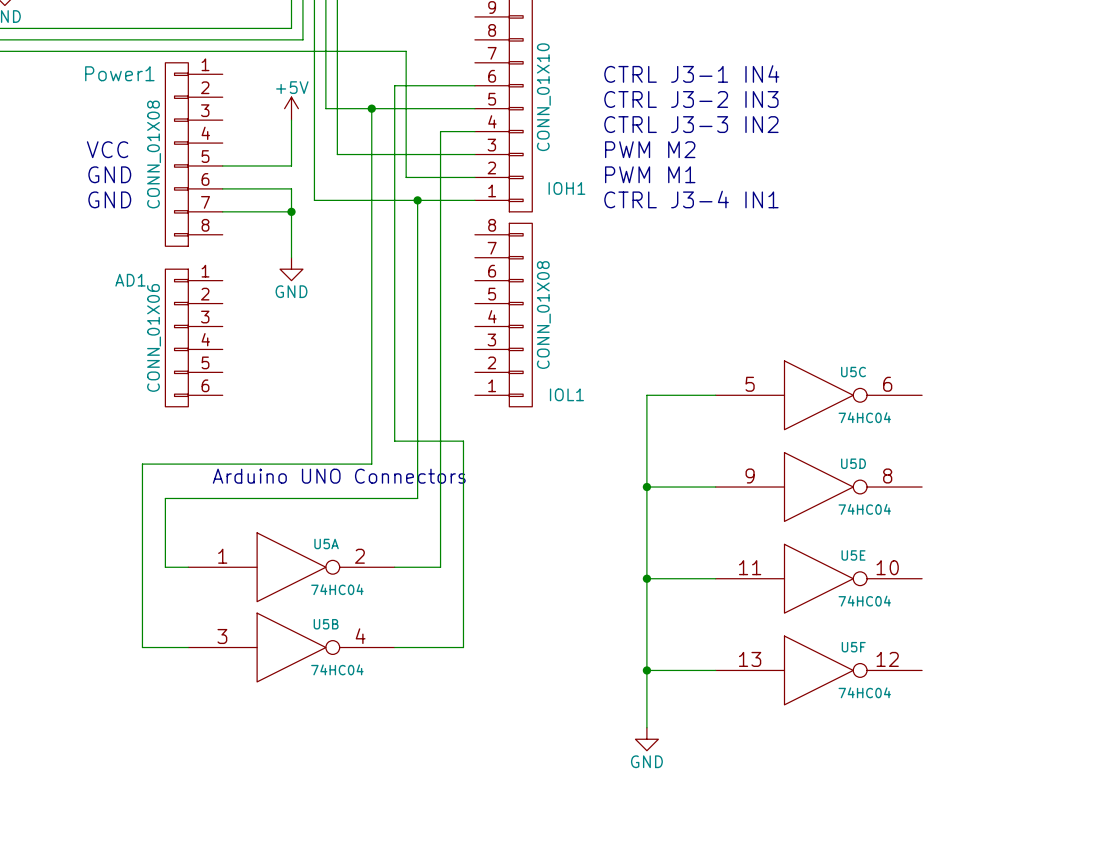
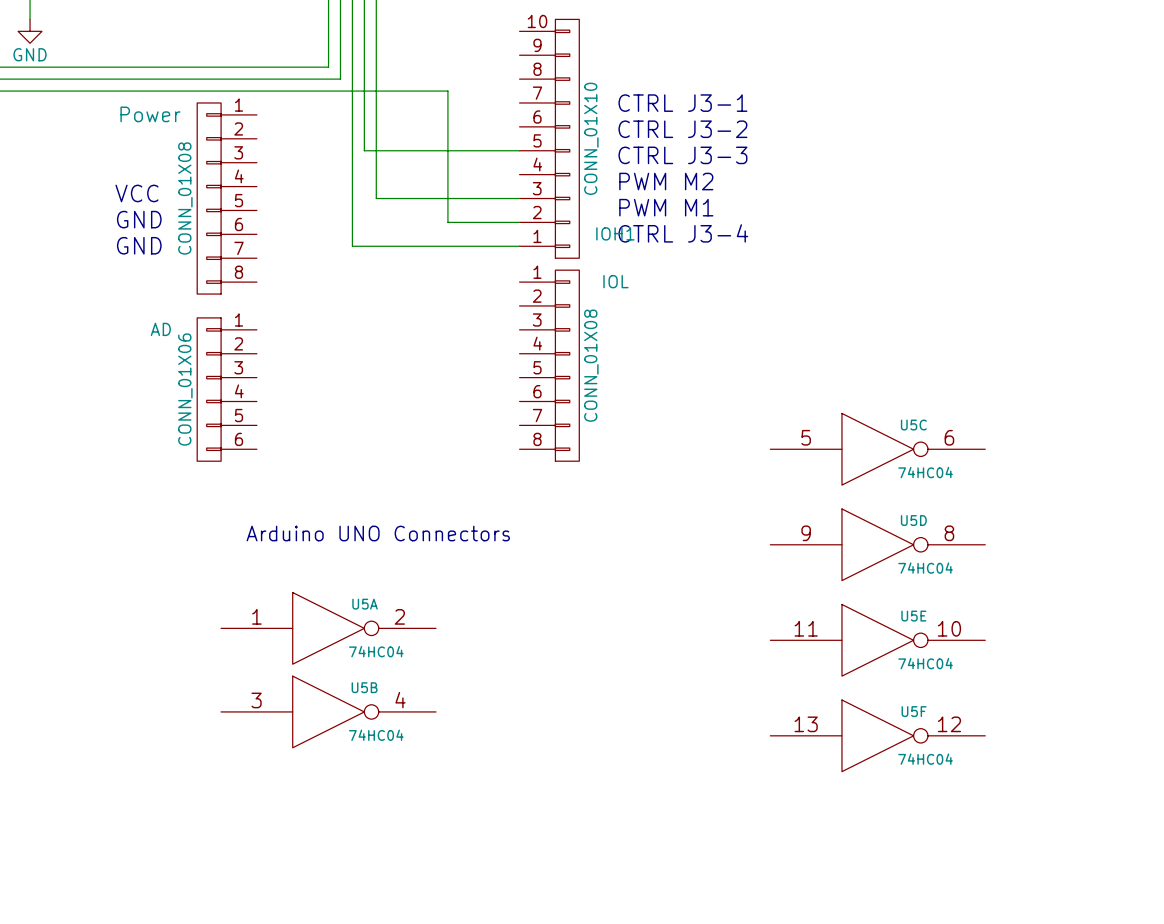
text: none -> CTRL J3-1 (682, 103)
Power1 name: Power1 (119, 73) -> Power (150, 114)
text: CTRL J3-1 IN4 (691, 74) -> none
wire: (474, 85) (394, 85) (394, 441) (463, 441) (463, 647) (394, 647) -> none
text: none -> CTRL J3-2 (682, 129)
text: CTRL J3-2 IN3 (691, 99) -> none
power symbol: +5V (291, 108) -> none
wire: (371, 108) (371, 464) (142, 464) (142, 647) (188, 647) -> none
junction: (371, 108) -> none
text: none -> CTRL J3-3 (682, 155)
wire: (291, 120) (291, 165) (222, 165) -> none
text: CTRL J3-3 IN2 (691, 124) -> none
wire: (474, 131) (440, 131) (440, 567) (394, 567) -> none
text position: PWM M2 (650, 149) -> PWM M2 (666, 181)
text position: PWM M1 (650, 174) -> PWM M1 (666, 207)
wire: (222, 188) (291, 188) (291, 257) -> none
text: CTRL J3-4 IN1 (691, 199) -> CTRL J3-4 (683, 233)
wire: (417, 200) (417, 498) (165, 498) (165, 567) (188, 567) -> none
junction: (417, 200) -> none
wire: (222, 211) (291, 211) -> none
junction: (291, 211) -> none
power symbol: GND (291, 269) -> none
AD1 name: AD1 (130, 280) -> AD (160, 329)
IOL1 flip: as is (520, 315) -> up-down (567, 365)
IOL1 name: IOL1 (566, 394) -> IOL (615, 281)
wire: (715, 395) (646, 395) (646, 727) -> none
wire: (646, 487) (715, 487) -> none
junction: (646, 487) -> none
wire: (646, 578) (715, 578) -> none
junction: (646, 578) -> none
wire: (646, 670) (715, 670) -> none
junction: (646, 670) -> none
power symbol: GND (646, 739) -> none

